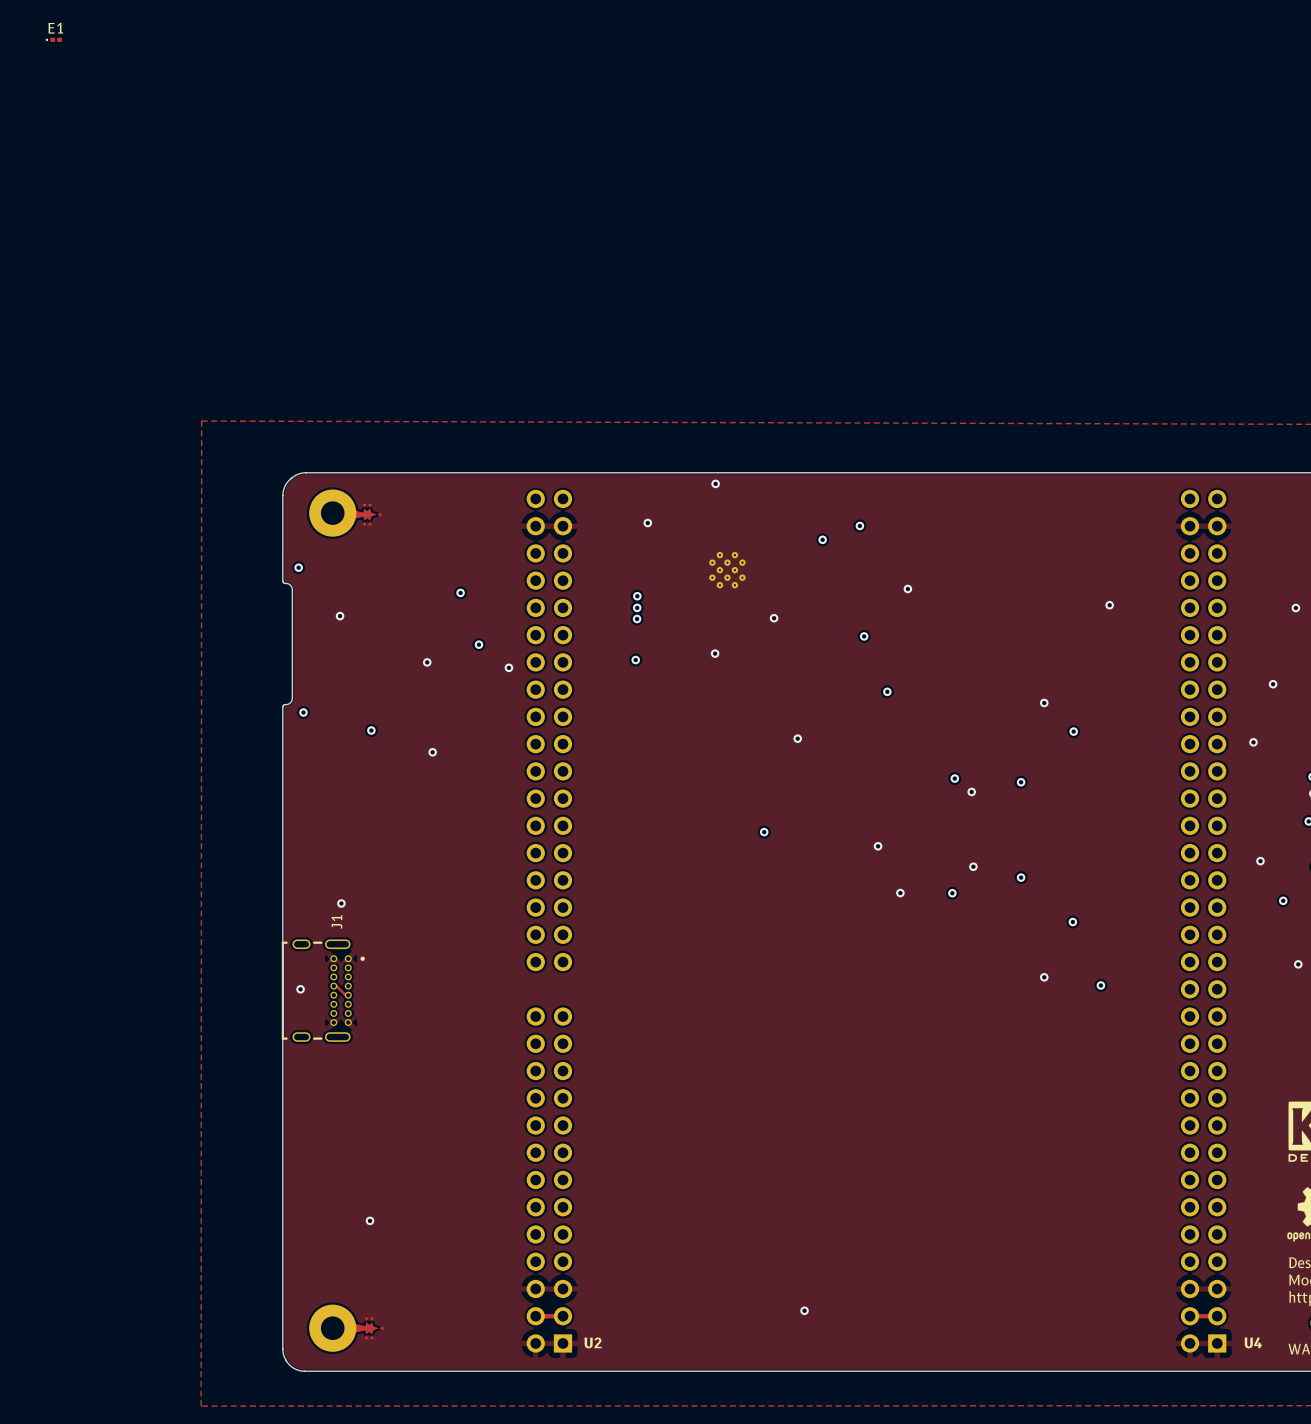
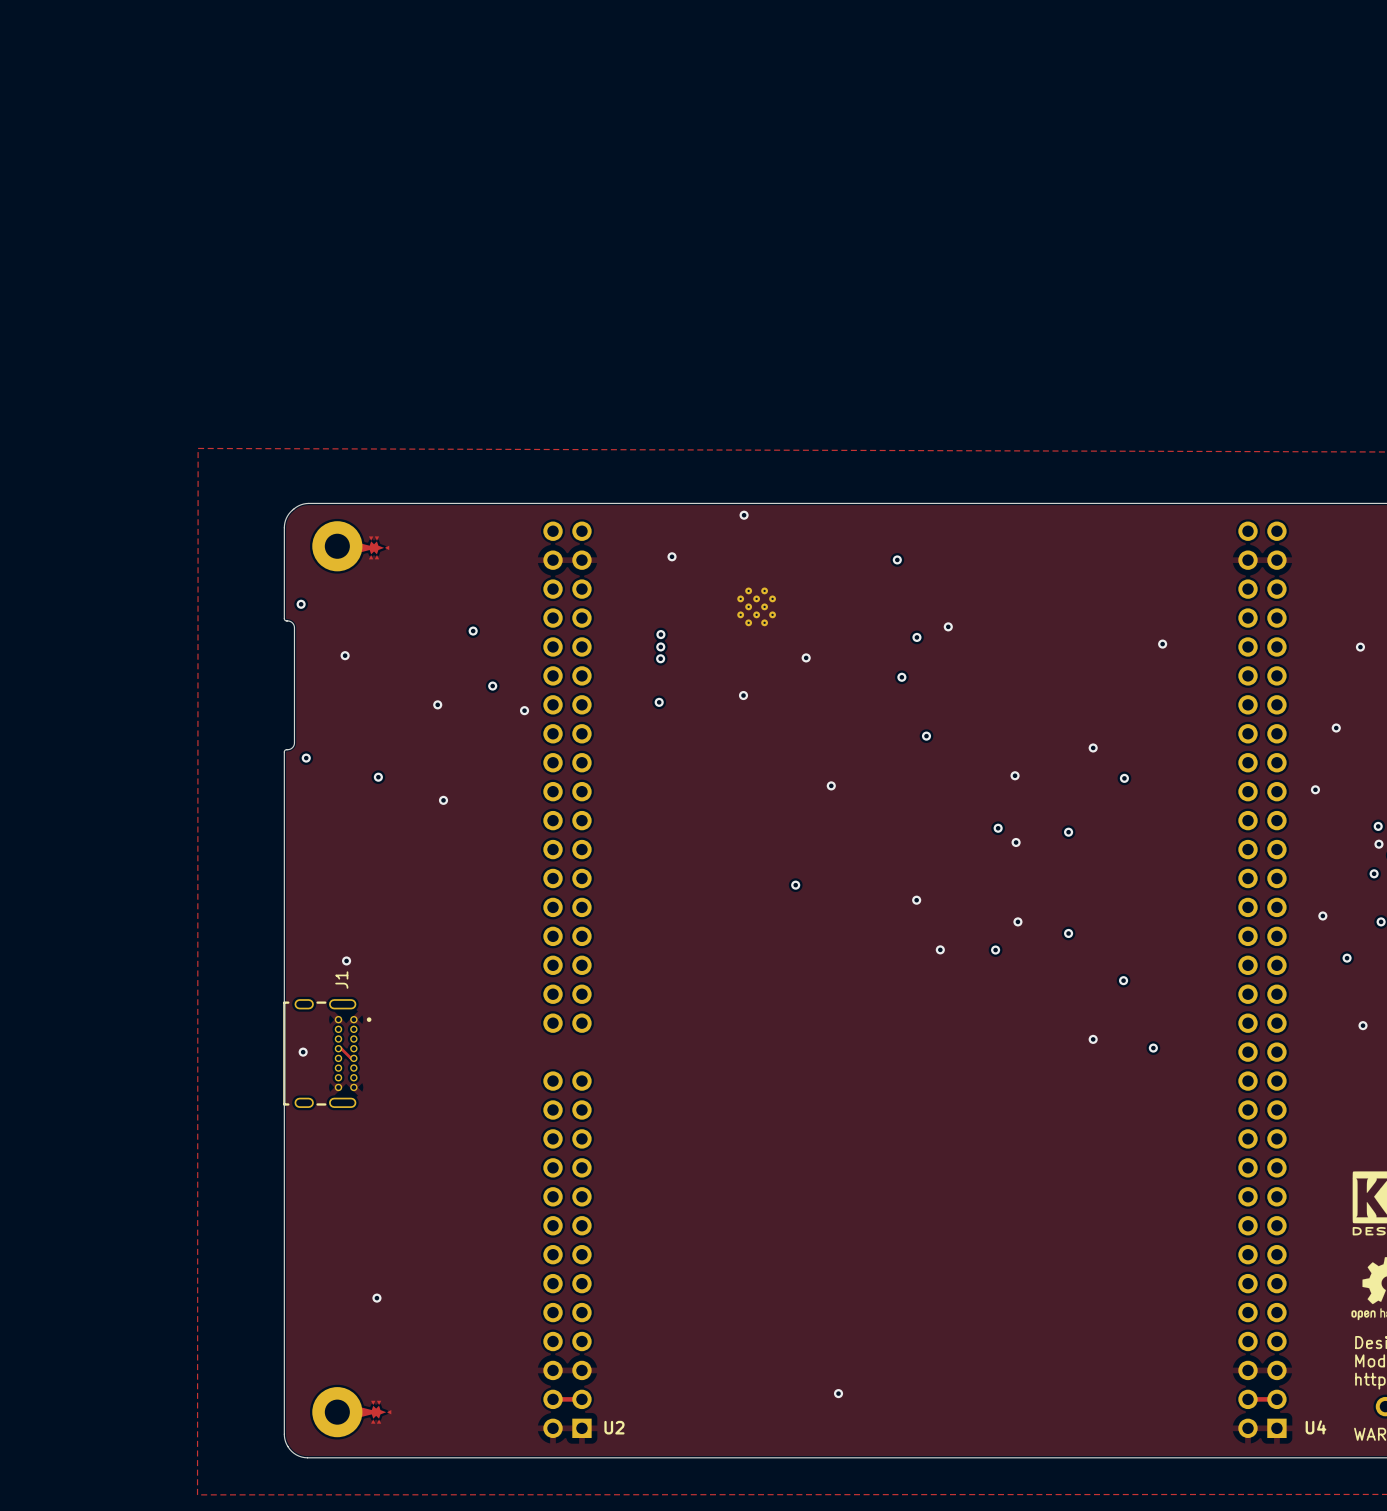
E1: (53, 39) -> none
via: (822, 539) -> none
via: none -> (916, 637)
via: none -> (1015, 775)

